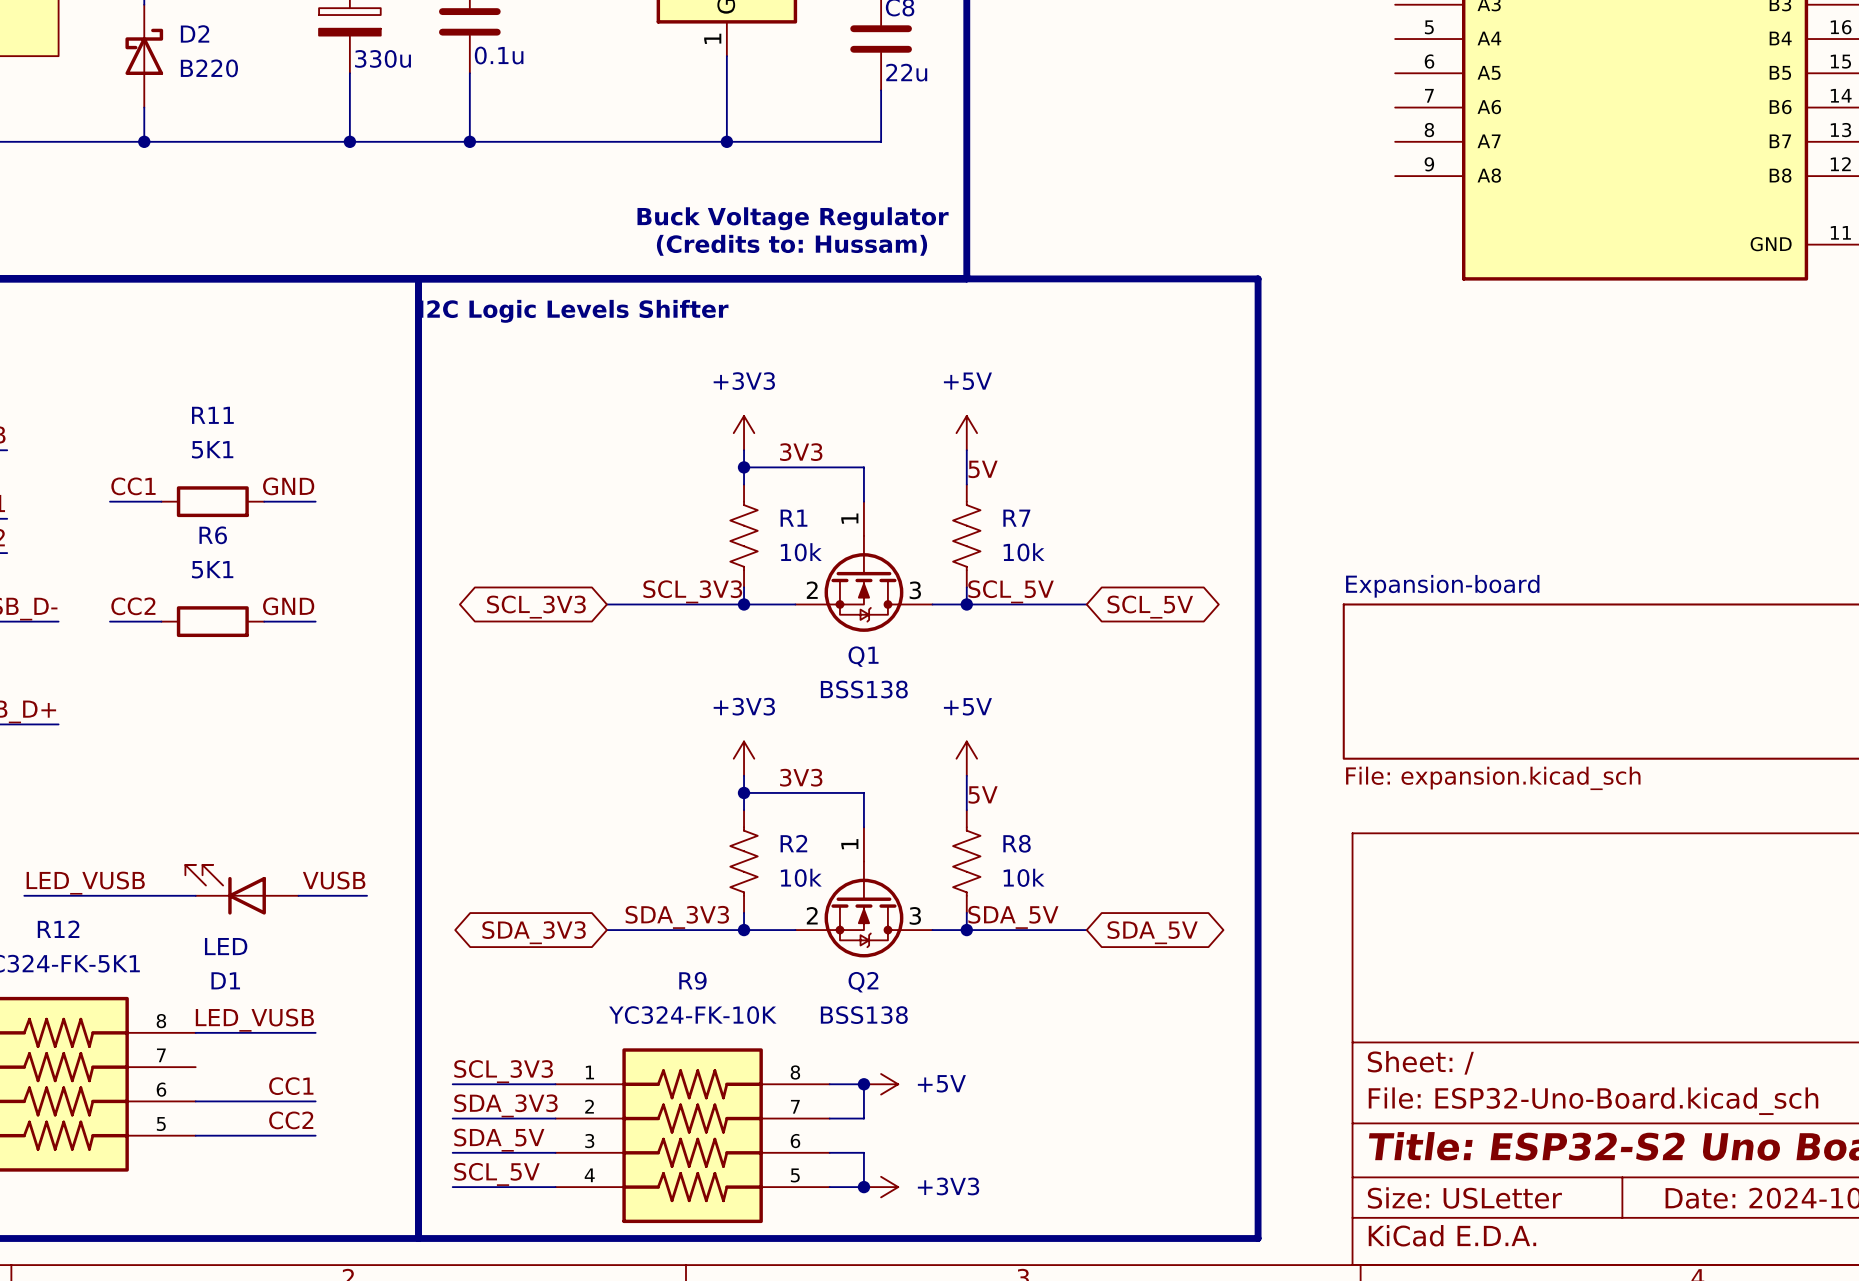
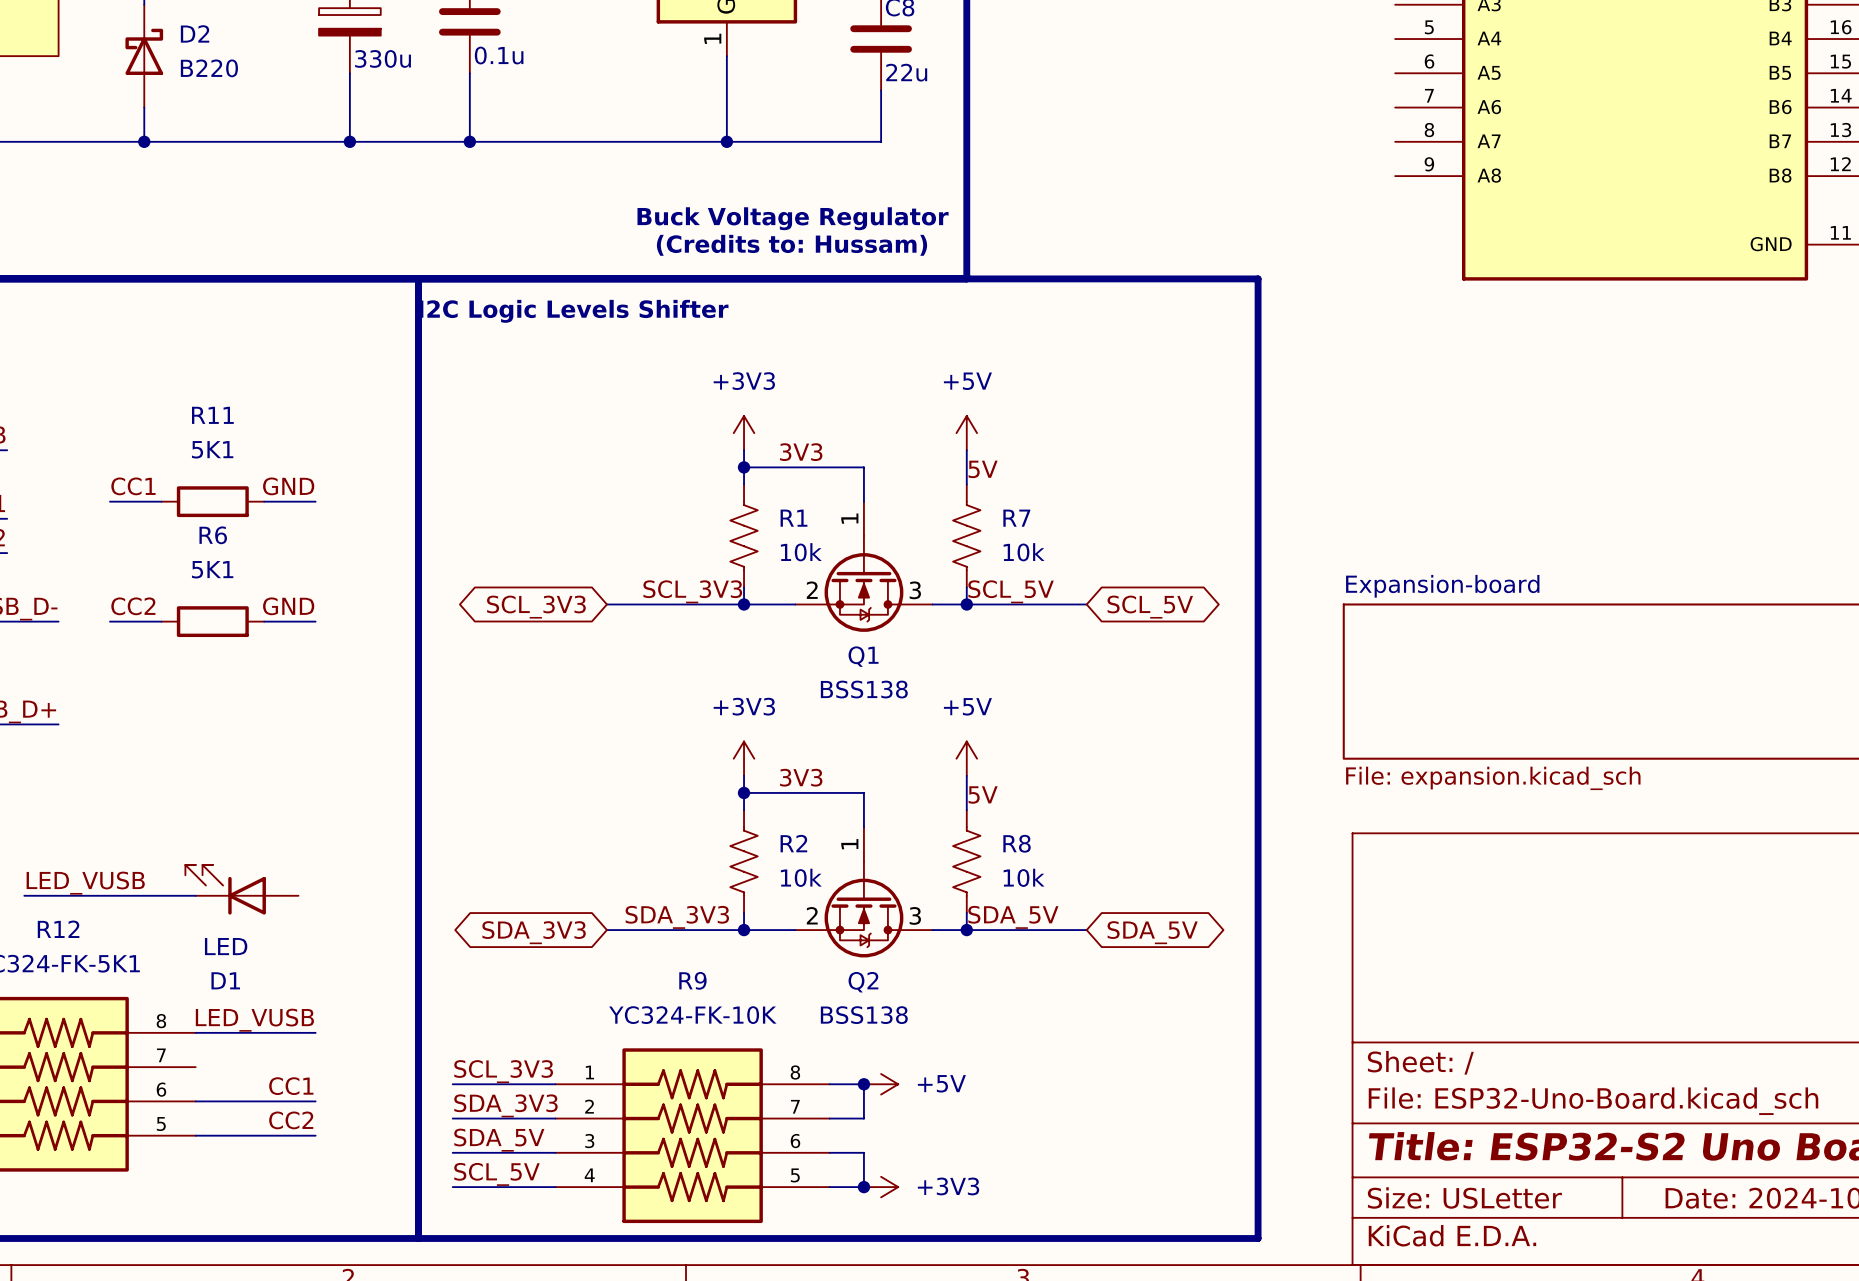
label: VUSB (334, 880) -> none
wire: (298, 895) (367, 895) -> none

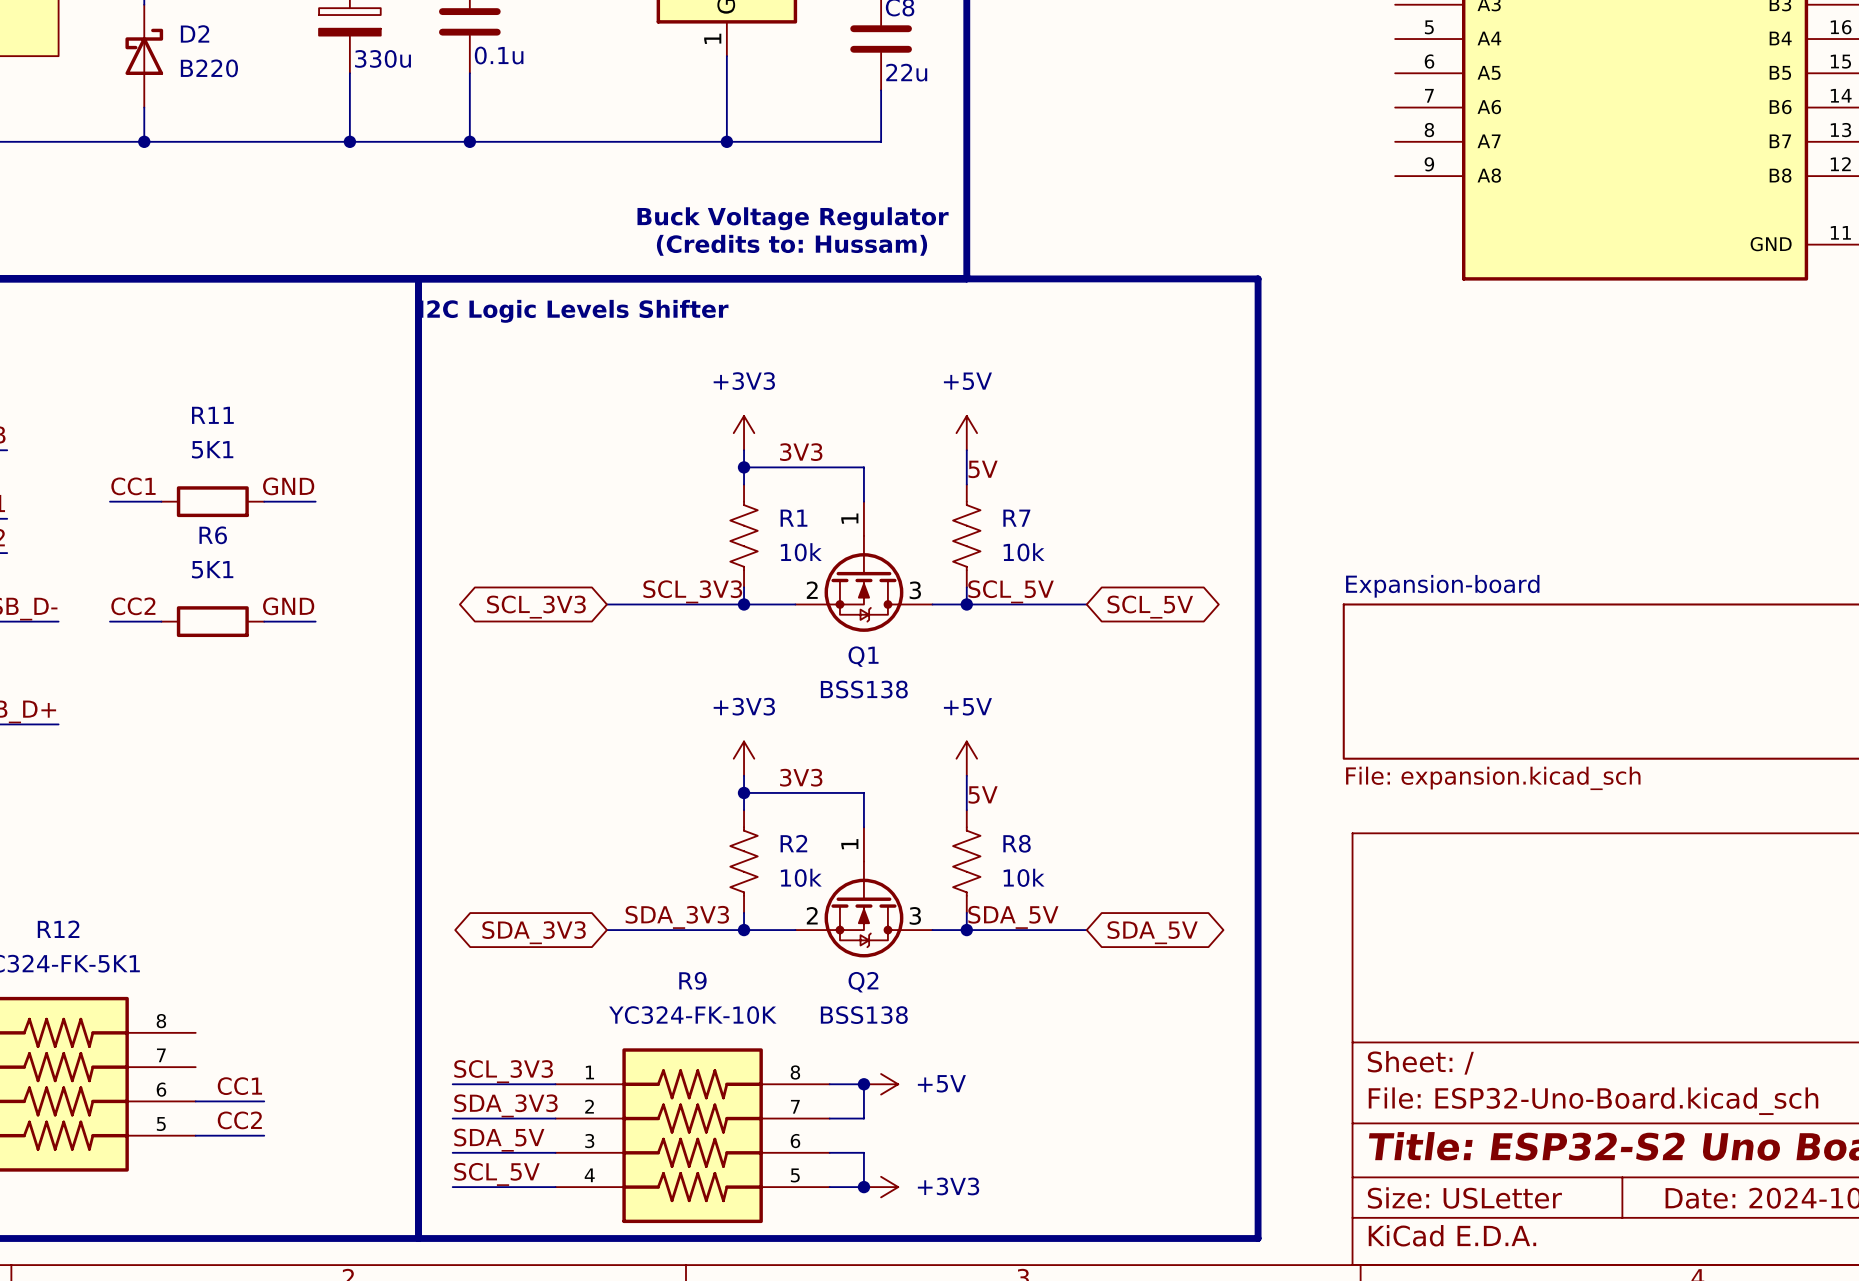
label: LED_VUSB (85, 883) -> none
D1: LED (241, 889) -> none
wire: (24, 895) (195, 895) -> none
label: LED_VUSB (254, 1020) -> none
wire: (195, 1032) (315, 1032) -> none
label position: CC1 (291, 1086) -> CC1 (239, 1086)
wire: (264, 1101) (315, 1101) -> none
label position: CC2 (291, 1120) -> CC2 (239, 1120)
wire: (264, 1135) (315, 1135) -> none

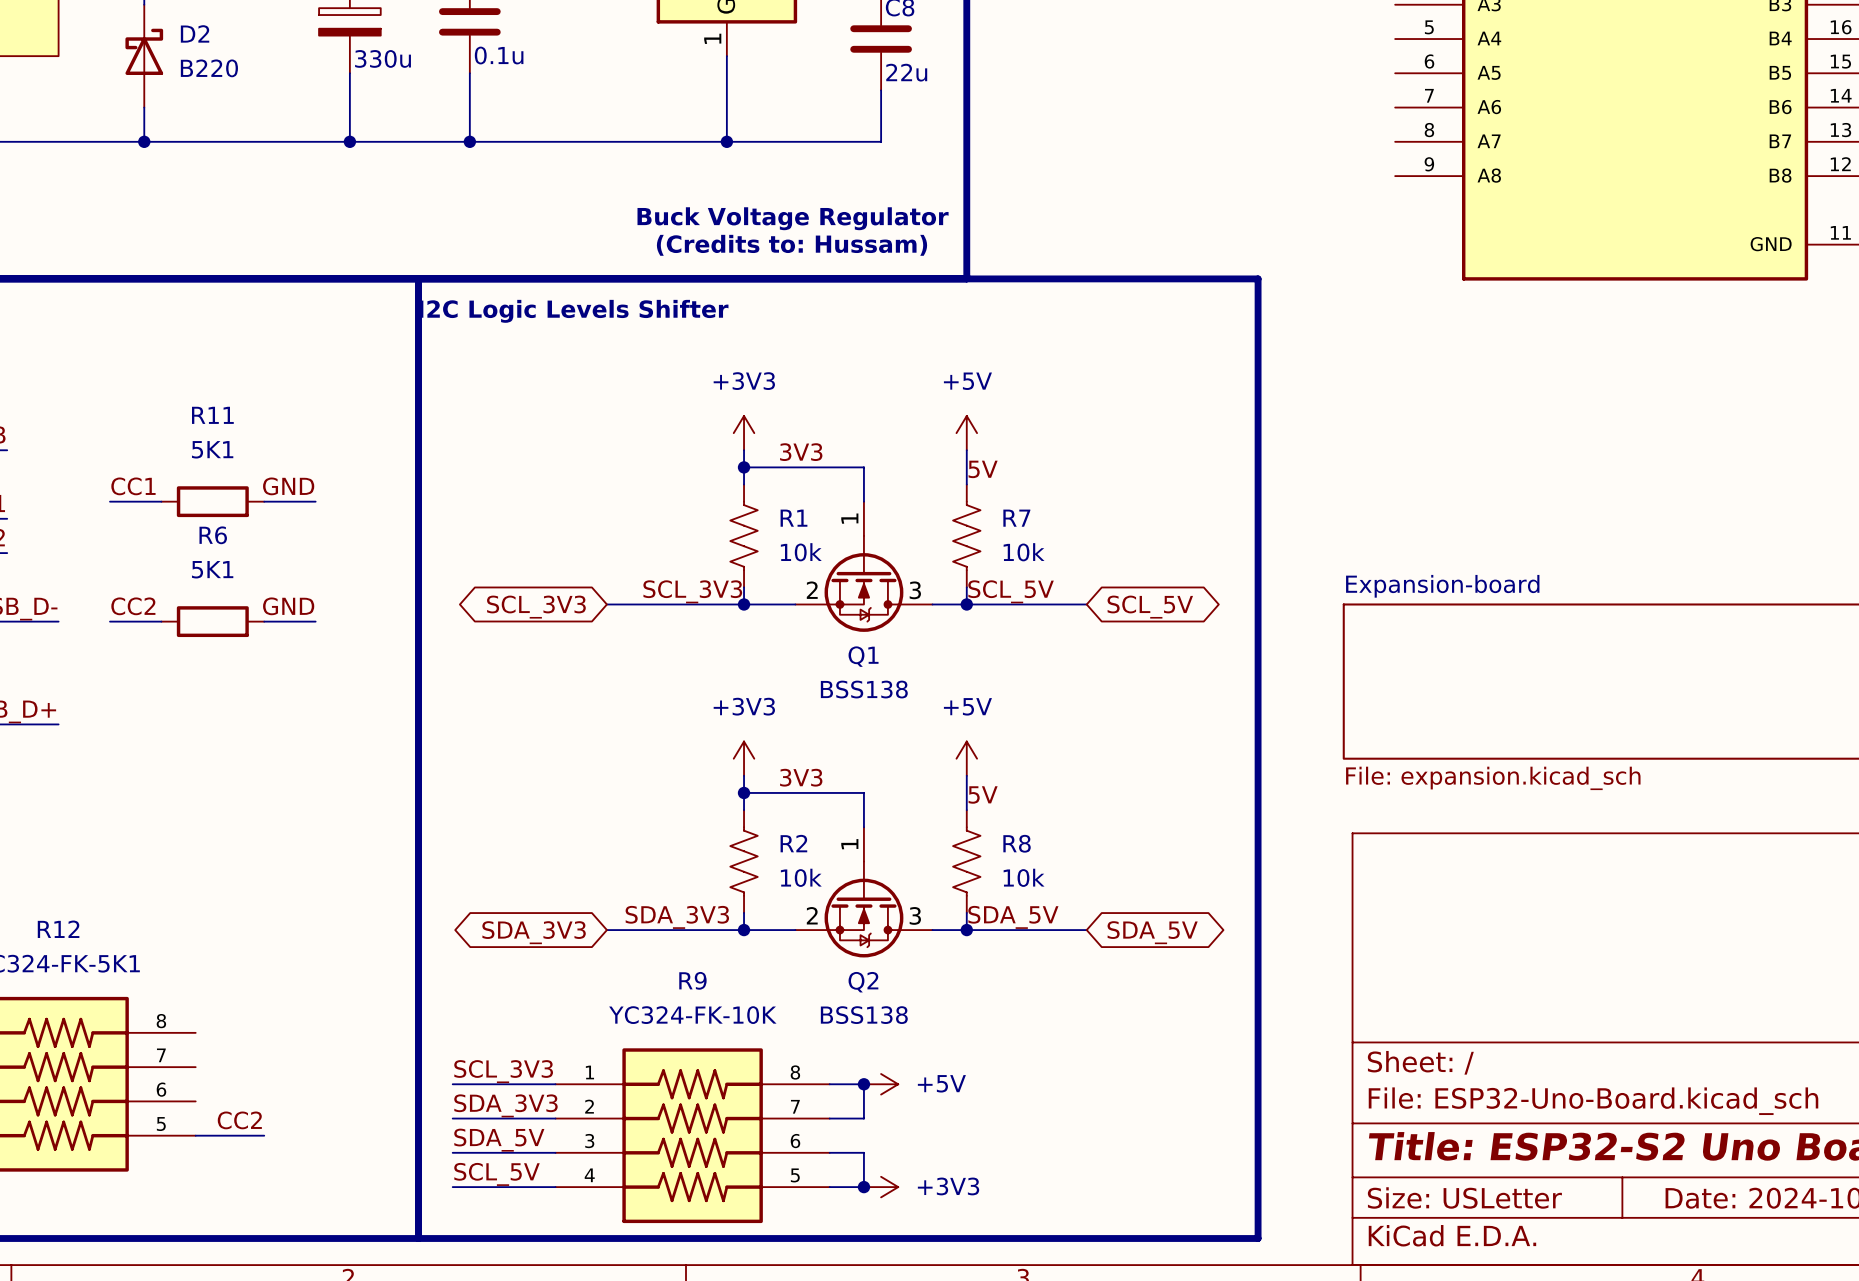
label: CC1 (239, 1086) -> none
wire: (195, 1101) (264, 1101) -> none

